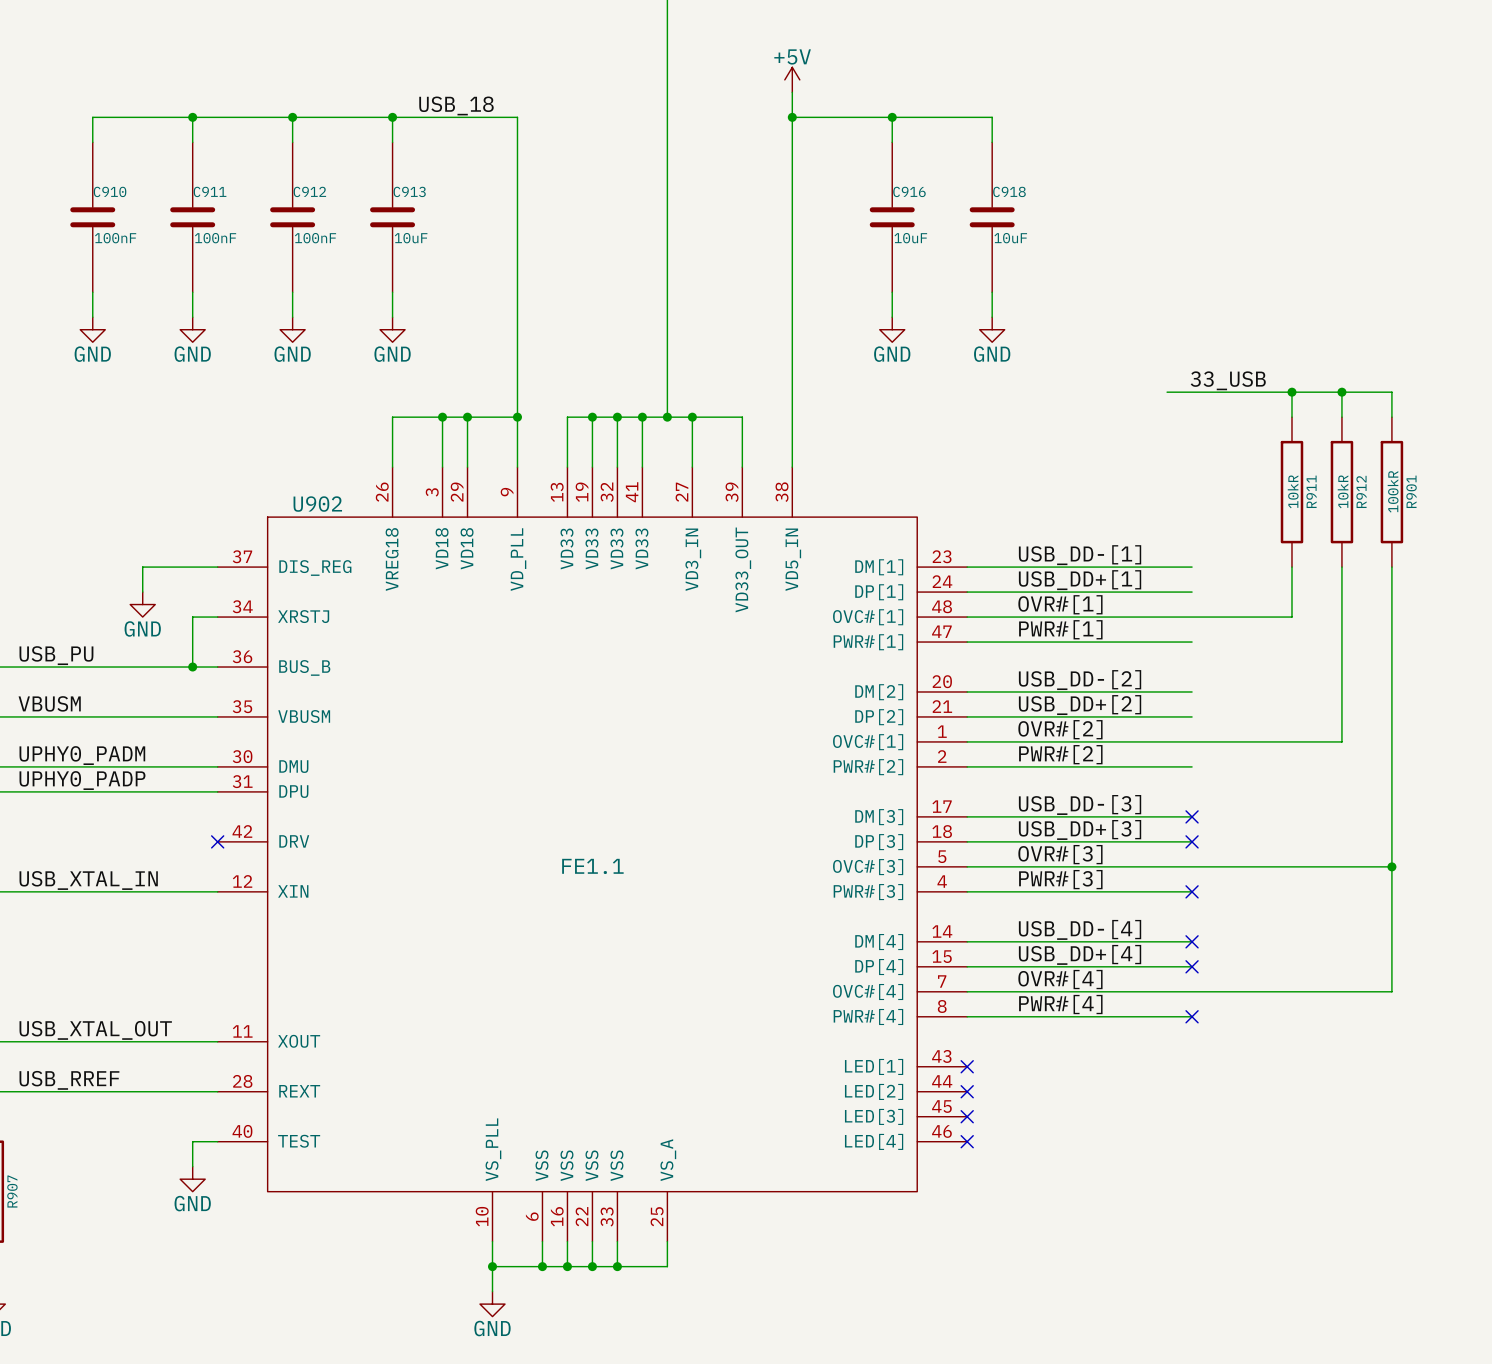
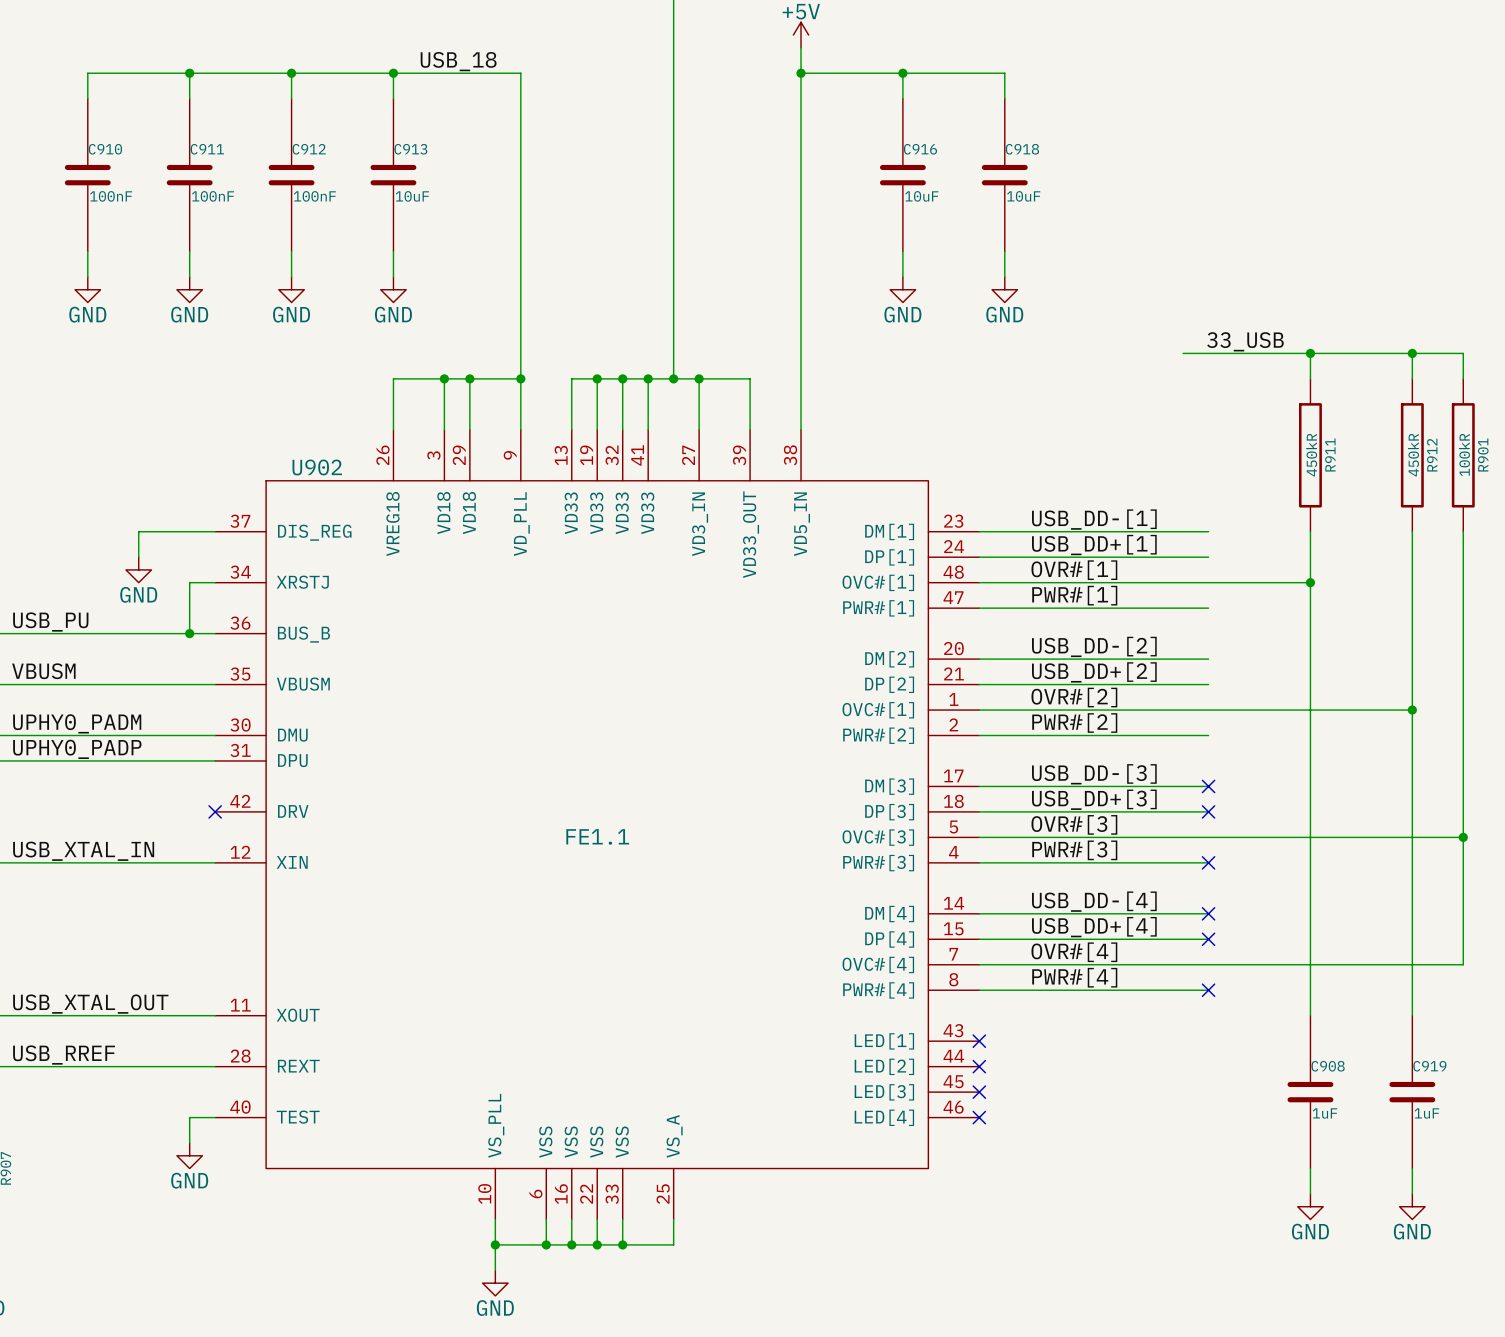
wire: (1341, 392) (1341, 417) -> none
junction position: (1341, 392) -> (1412, 353)
wire: none -> (1412, 353) (1463, 353) (1463, 378)
R911 value: 10kR (1293, 491) -> 450kR (1311, 455)
R901 value: 100kR (1393, 491) -> 450kR (1413, 455)
R901 name: R901 (1411, 491) -> R912 (1432, 455)
R912: 10kR (1341, 492) -> none
R901: none -> 100kR (1463, 455)
wire: (1341, 567) (1341, 741) -> (1412, 710) (1361, 710)
wire: none -> (1463, 531) (1463, 964) (1412, 964) (1412, 1015)
wire: none -> (1310, 582) (1310, 1015)
junction: none -> (1310, 582)
junction: none -> (1412, 710)
wire: none -> (1412, 837) (1463, 837)
junction position: (1391, 866) -> (1463, 837)
C908: none -> 1uF (1310, 1092)
C919: none -> 1uF (1412, 1092)
wire: none -> (1310, 1168) (1310, 1194)
wire: none -> (1412, 1168) (1412, 1194)
power symbol: none -> GND (1310, 1206)
power symbol: none -> GND (1412, 1206)

